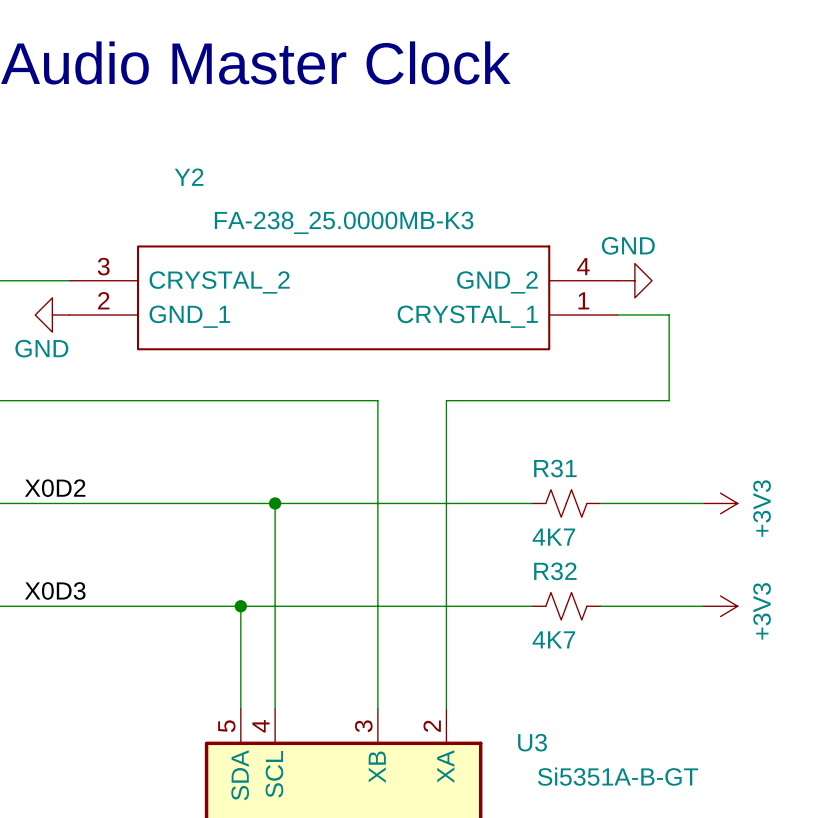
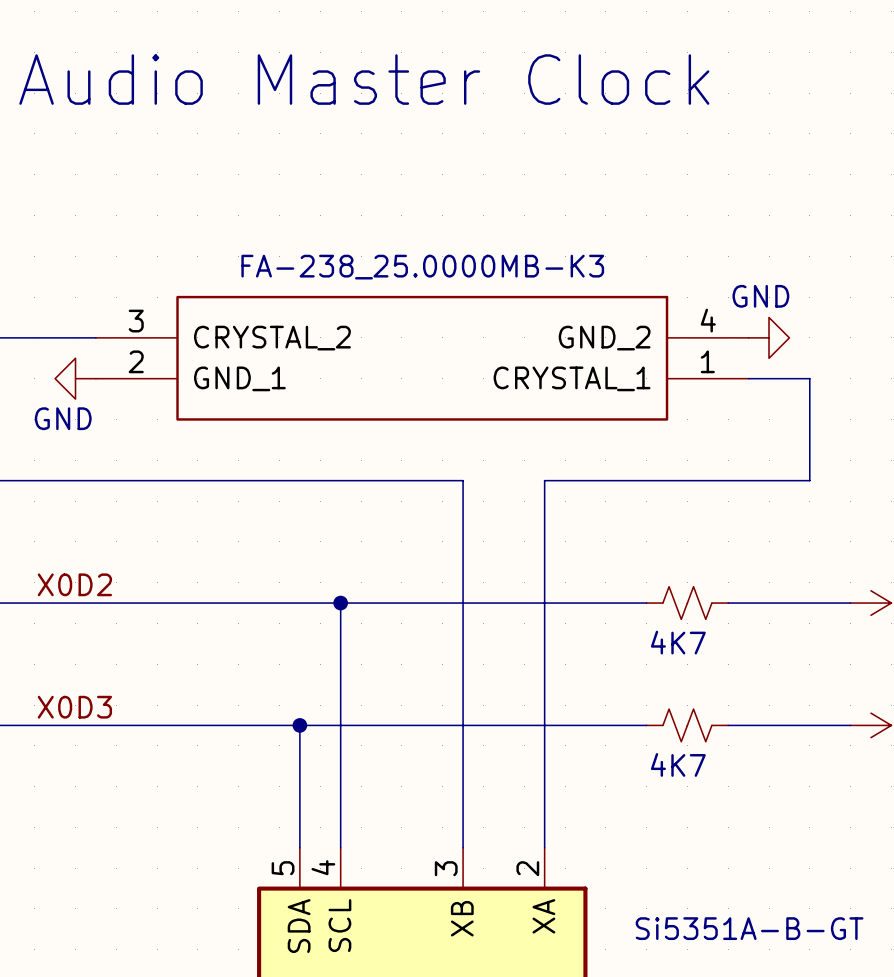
Y2 name: Y2 (189, 177) -> none
R31 name: R31 (555, 468) -> none
R32 name: R32 (555, 571) -> none
U3 name: U3 (532, 742) -> none

